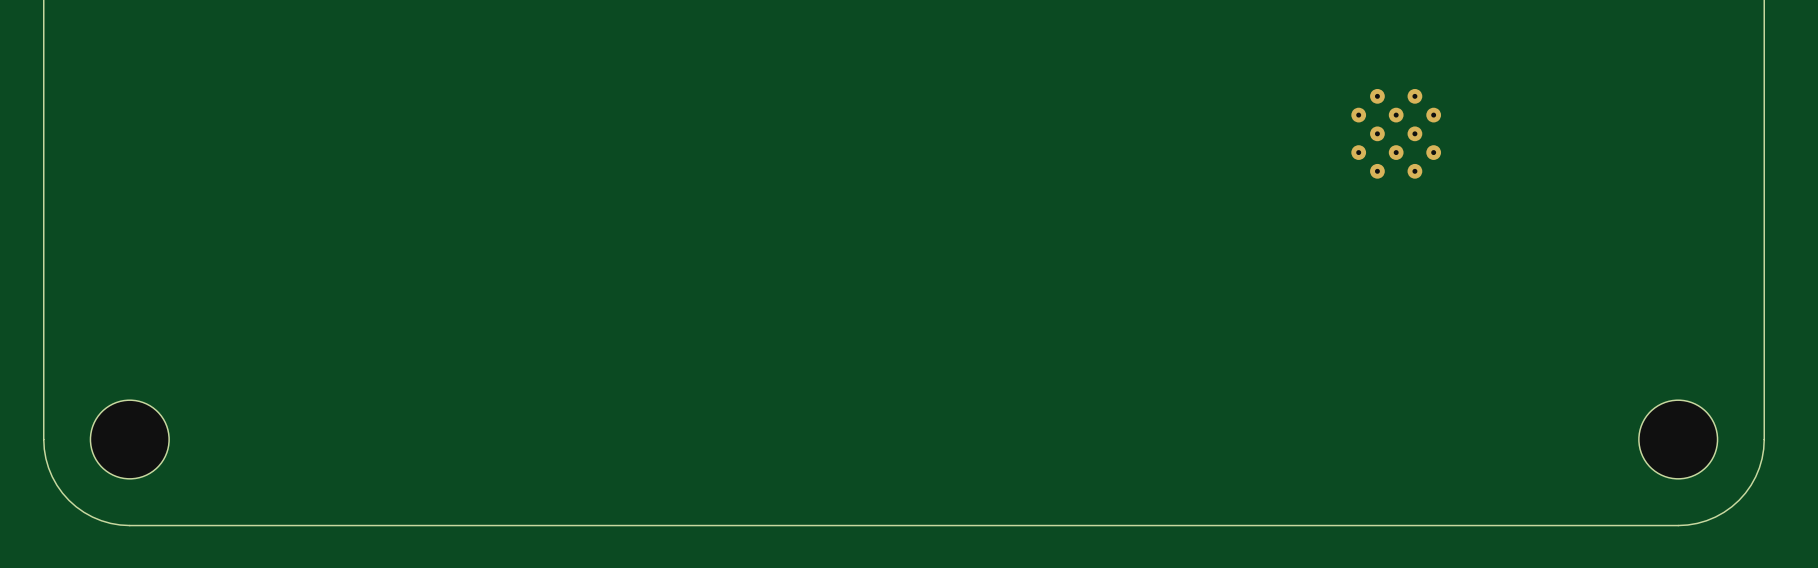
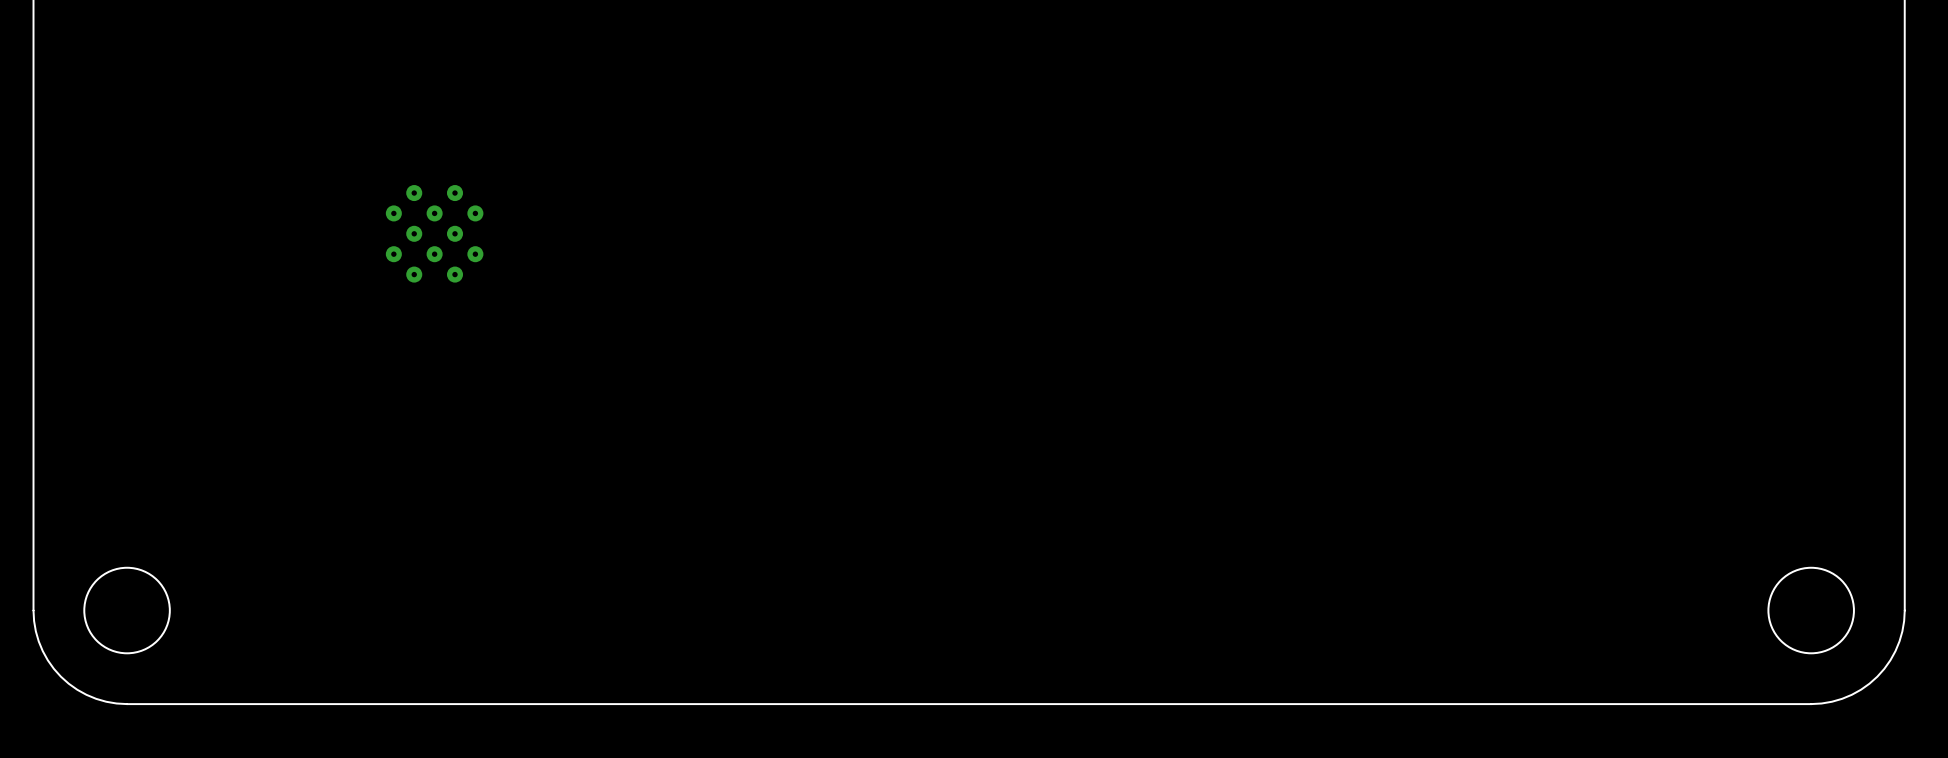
part: none -> (434, 233)
part: (1396, 133) -> none

